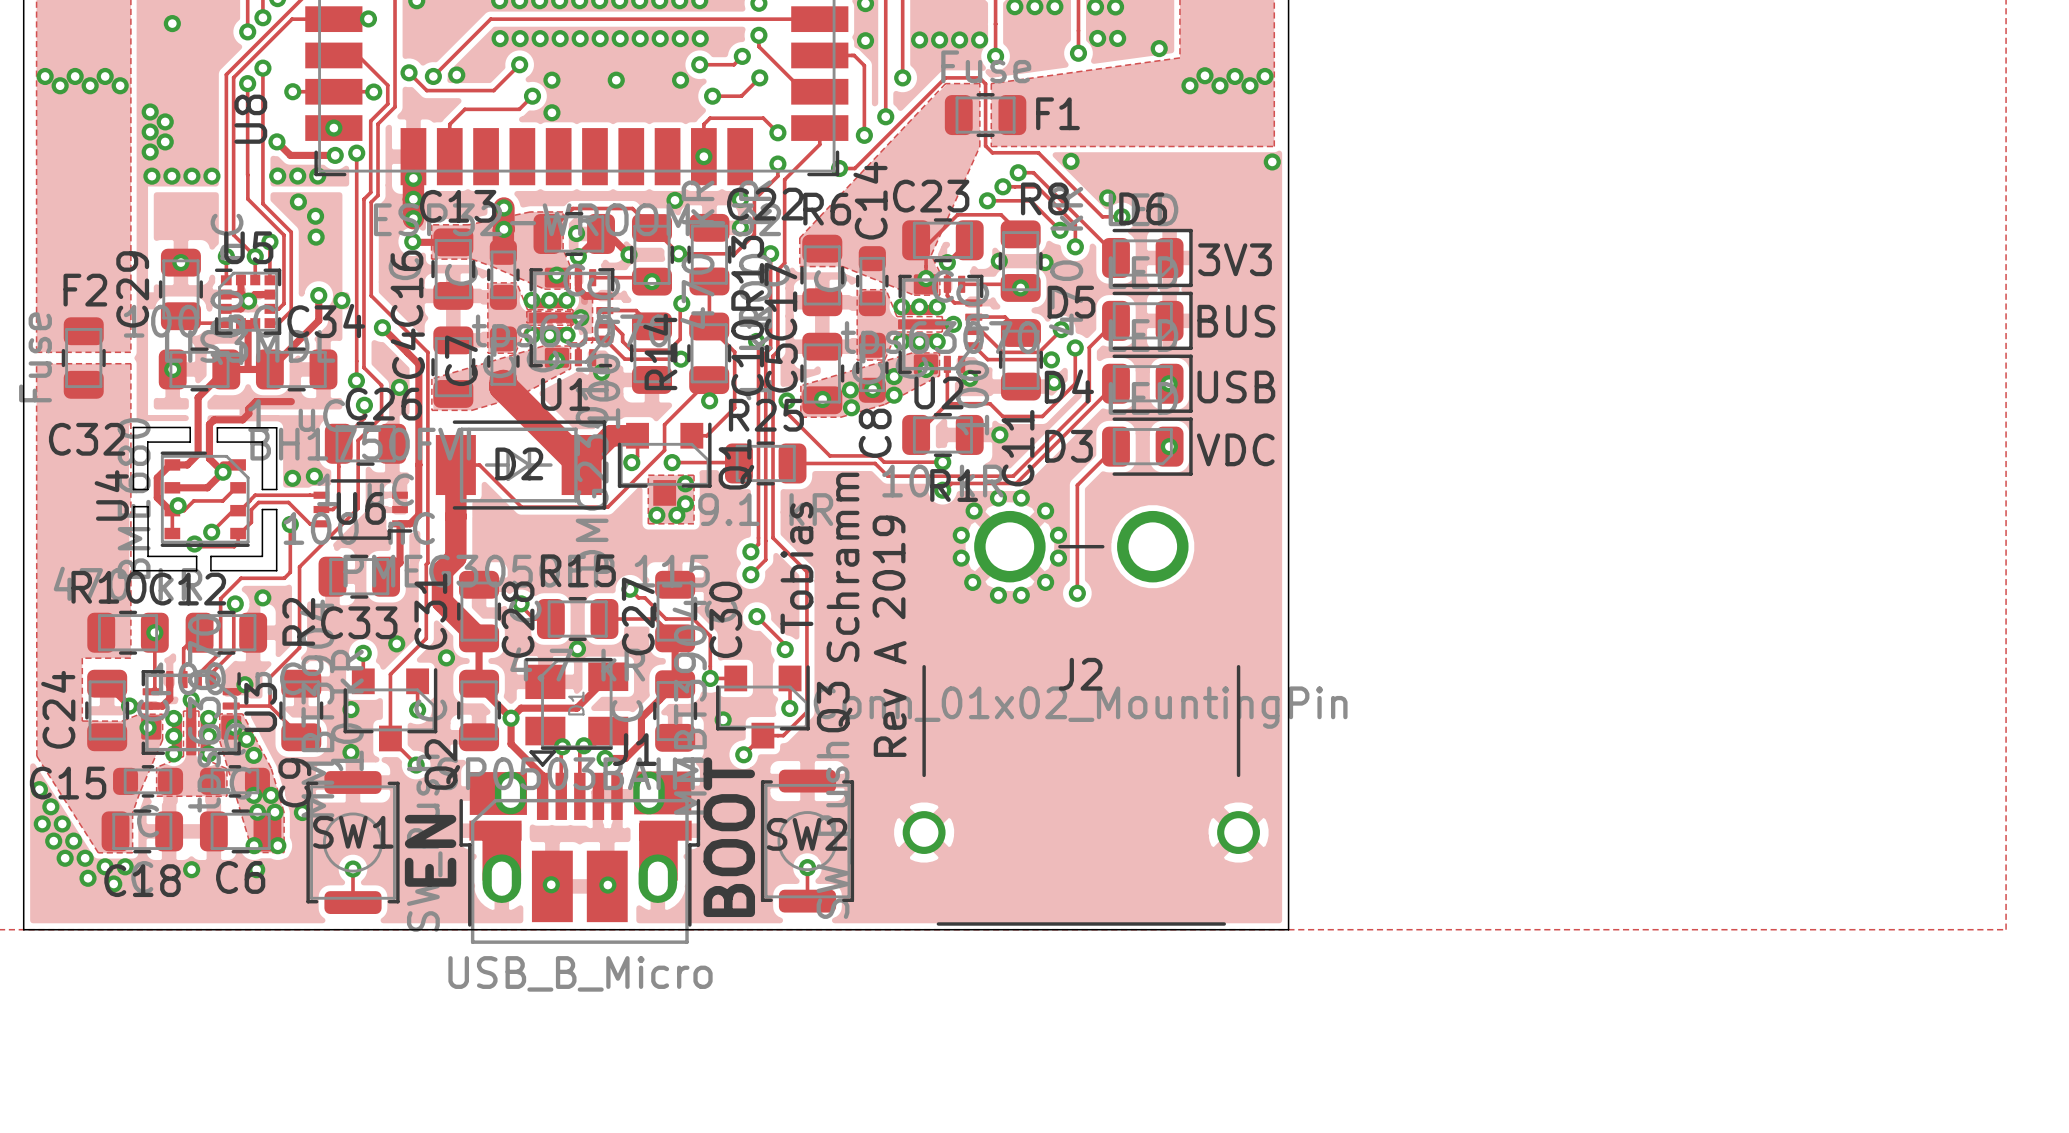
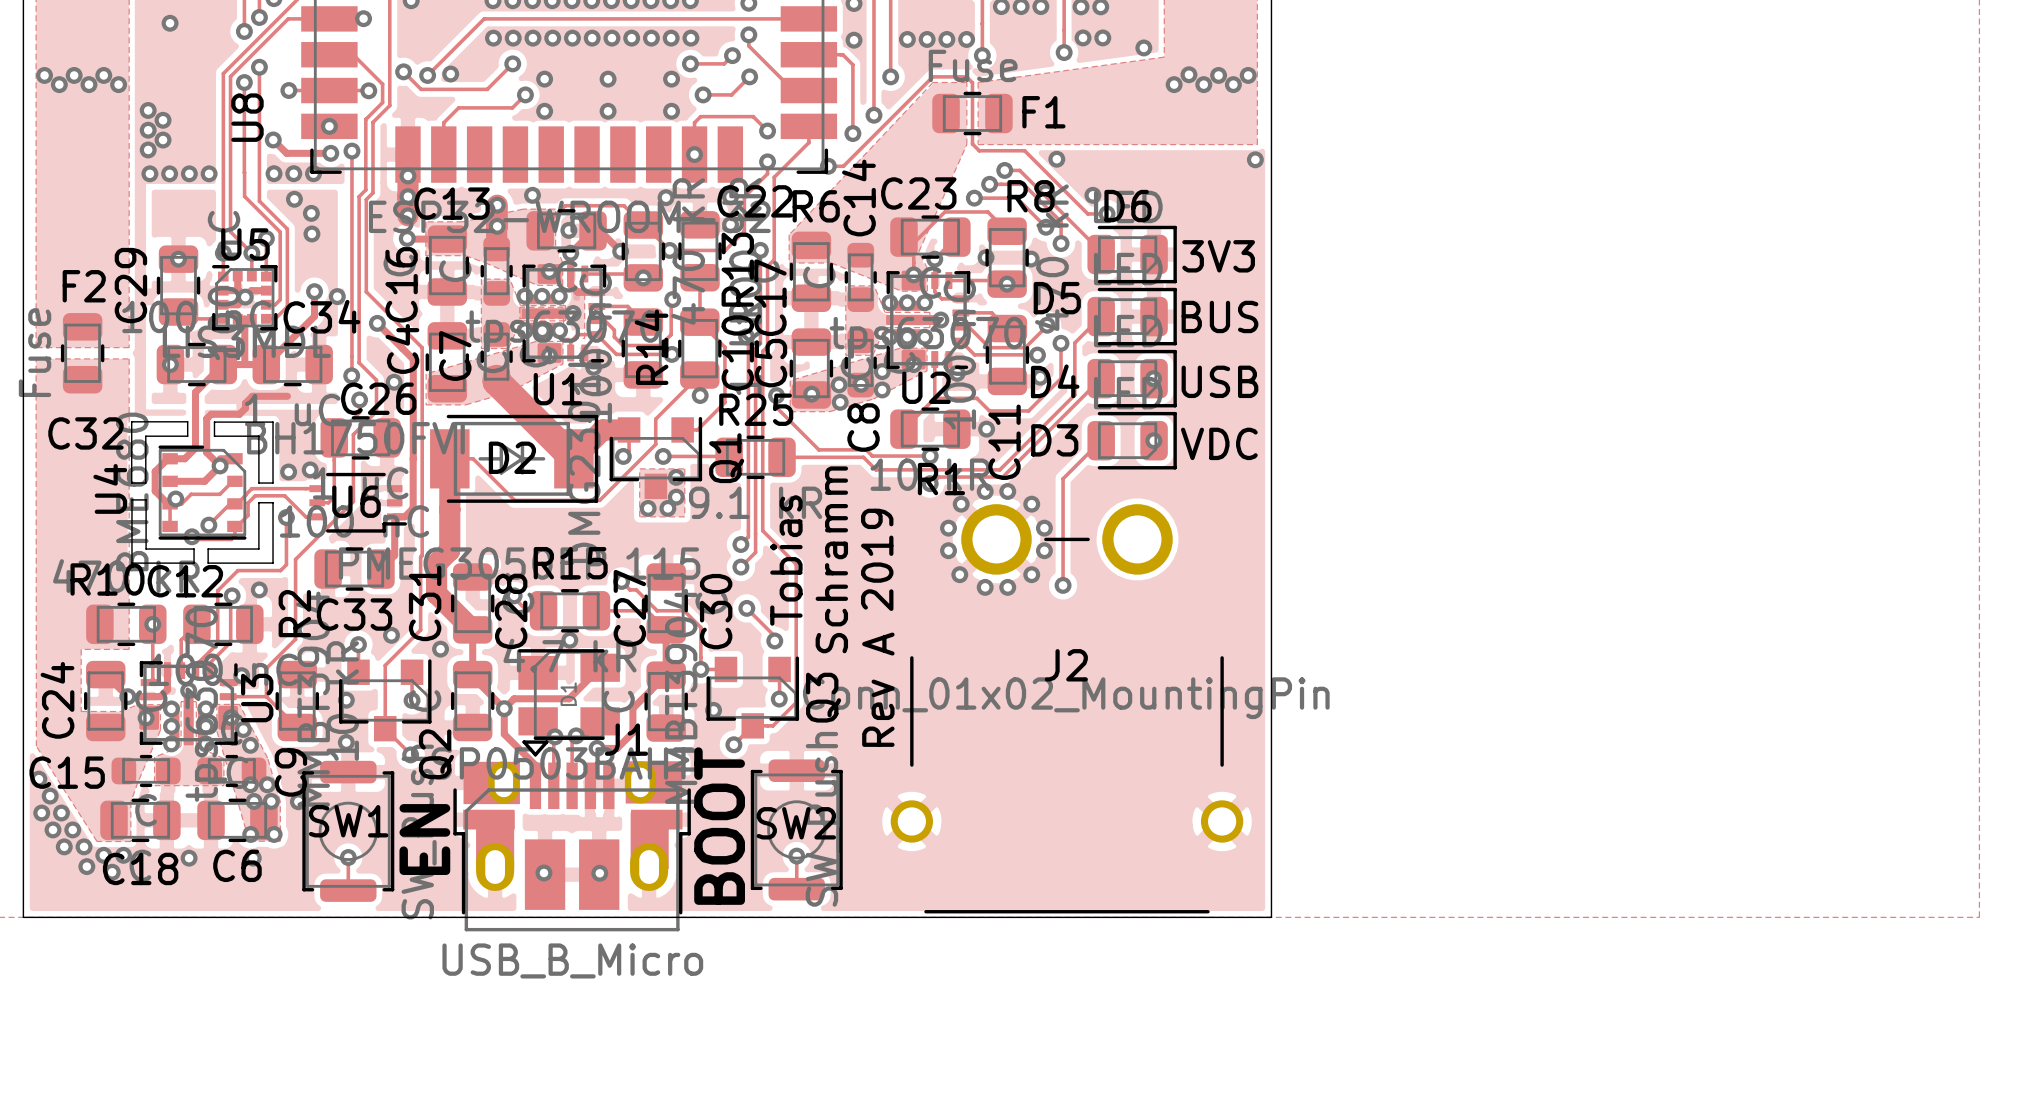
via: none -> (608, 111)
via: none -> (671, 111)
via: none -> (532, 195)

